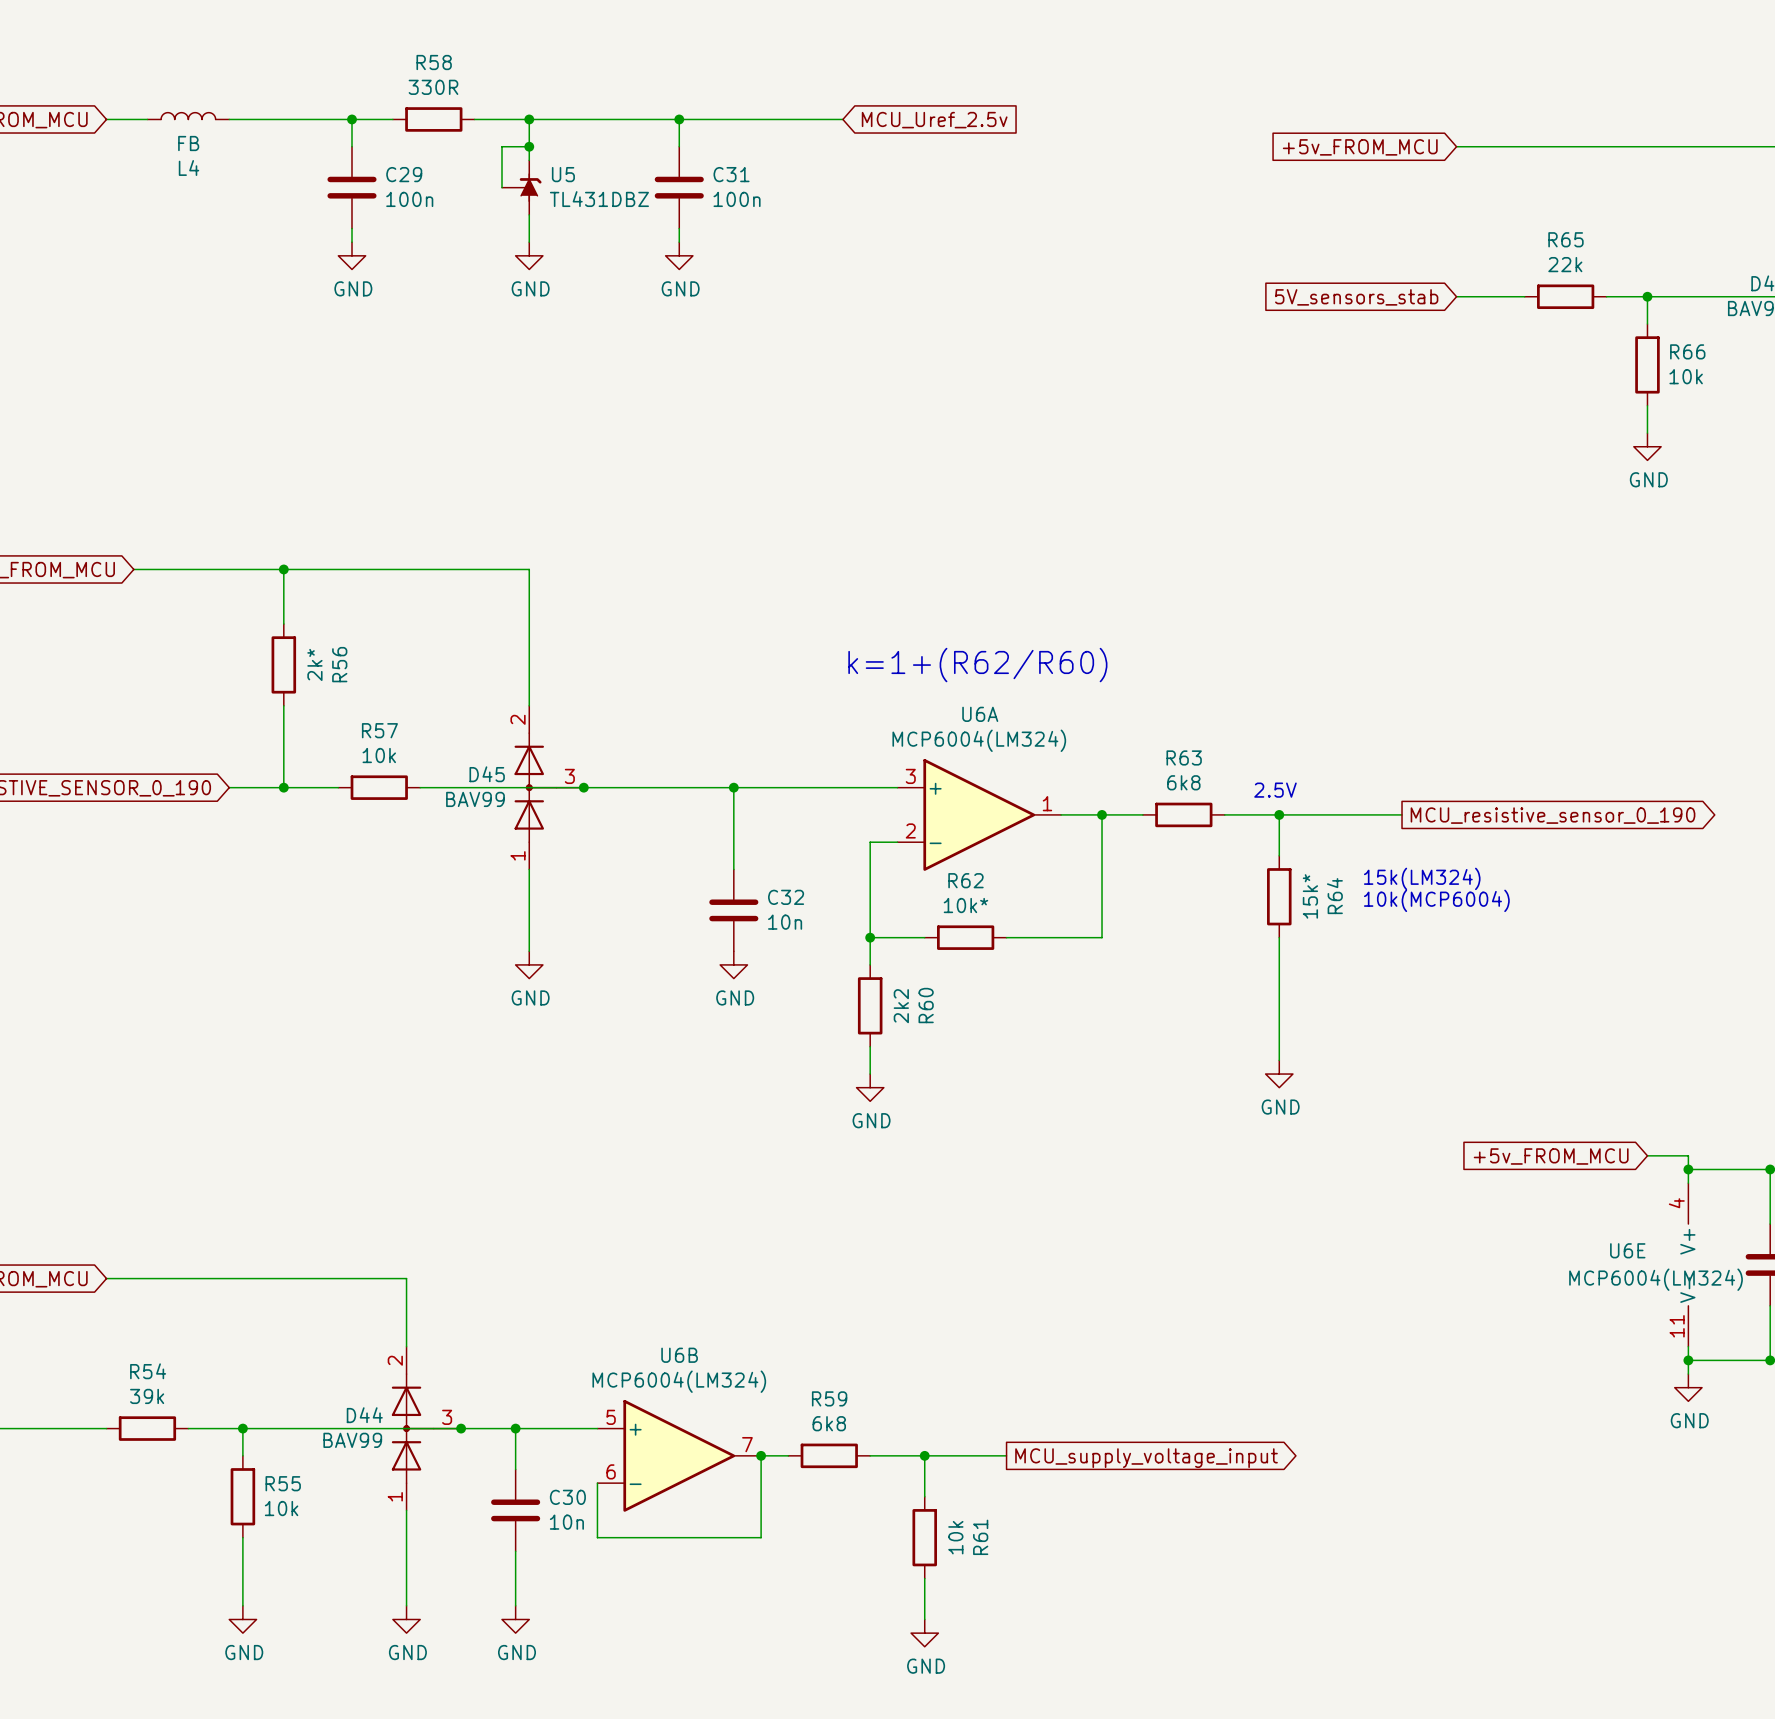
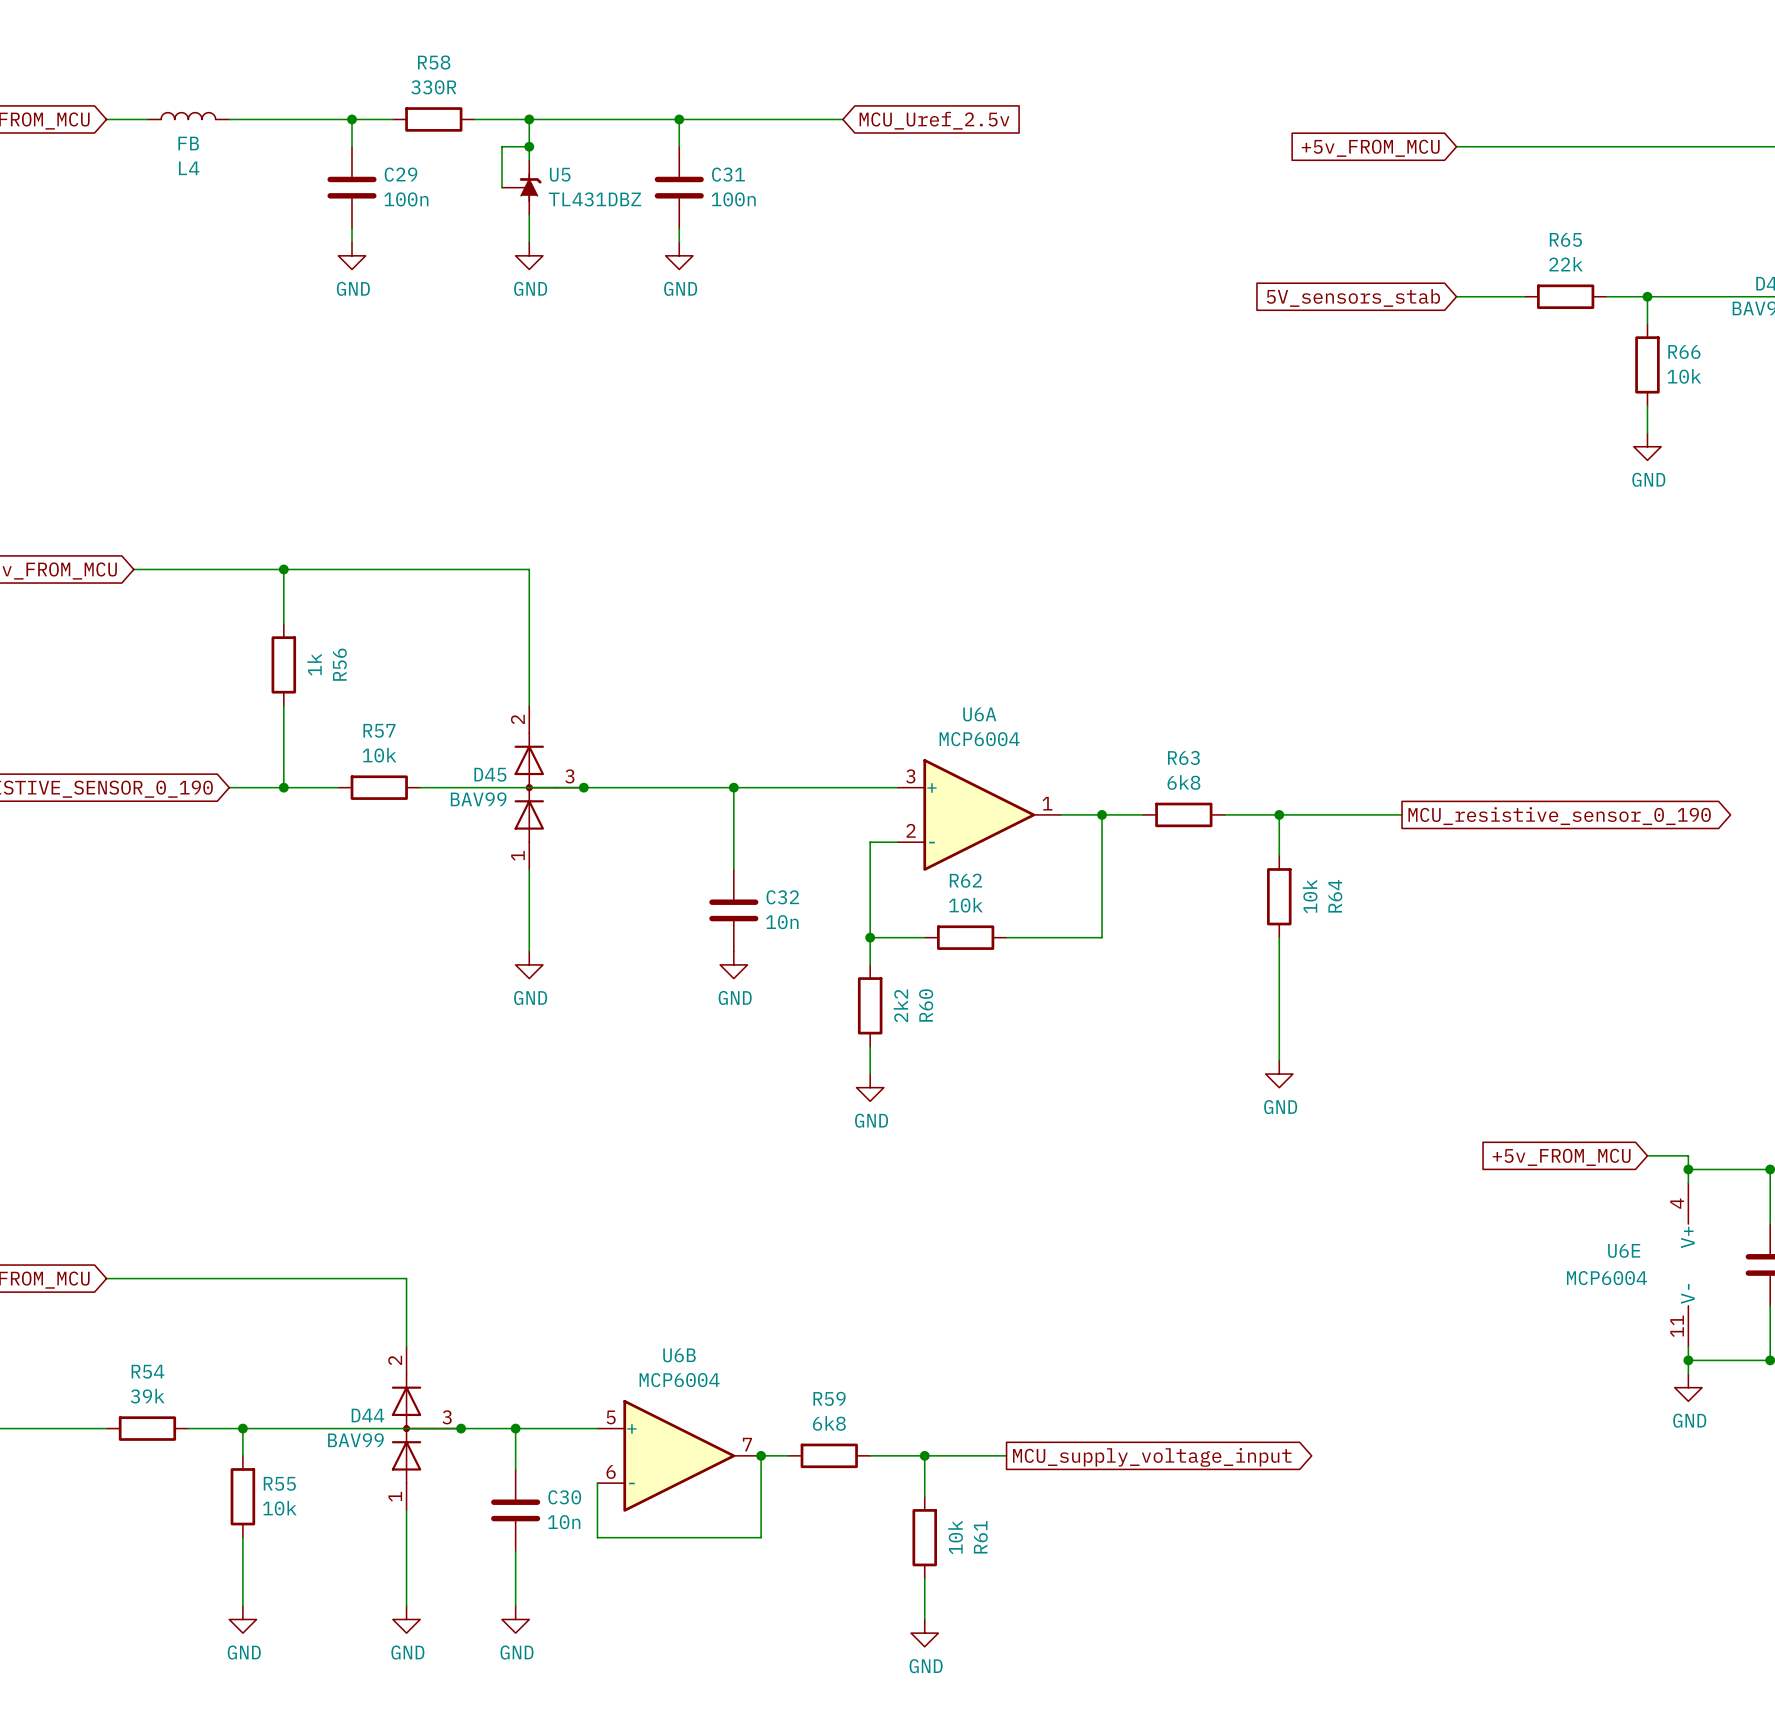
R56 value: 2k* (314, 664) -> 1k (314, 664)
text: k=1+(R62/R60) (977, 665) -> none
U6A value: MCP6004(LM324) (979, 740) -> MCP6004 (979, 739)
text: 2.5V (1275, 790) -> none
text: 15k(LM324) (1422, 878) -> none
R64 value: 15k* (1310, 896) -> 10k (1310, 896)
text: 10k(MCP6004) (1436, 900) -> none
R62 value: 10k* (965, 905) -> 10k (965, 905)
U6E value: MCP6004(LM324) (1656, 1279) -> MCP6004 (1606, 1278)
U6B value: MCP6004(LM324) (679, 1381) -> MCP6004 (679, 1380)

